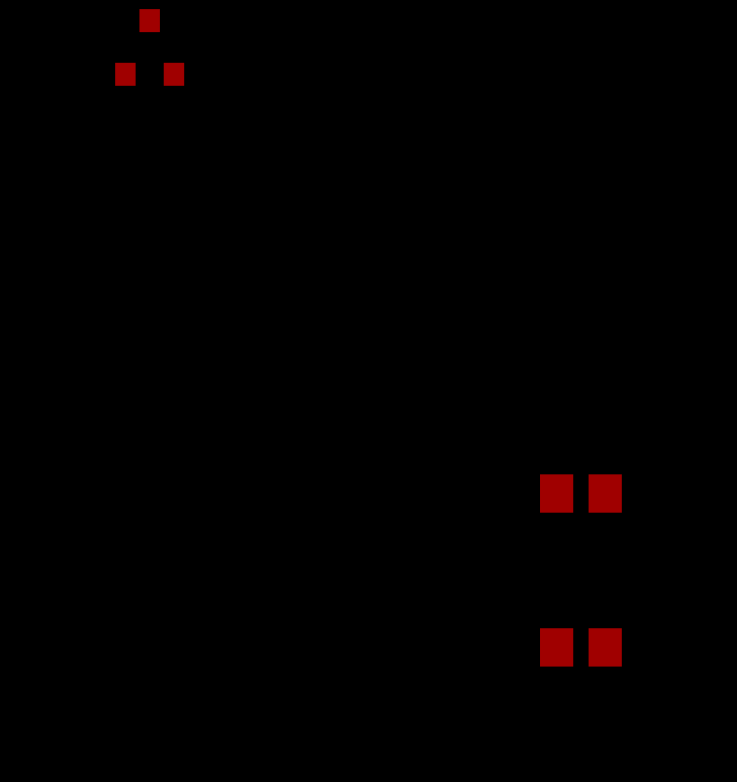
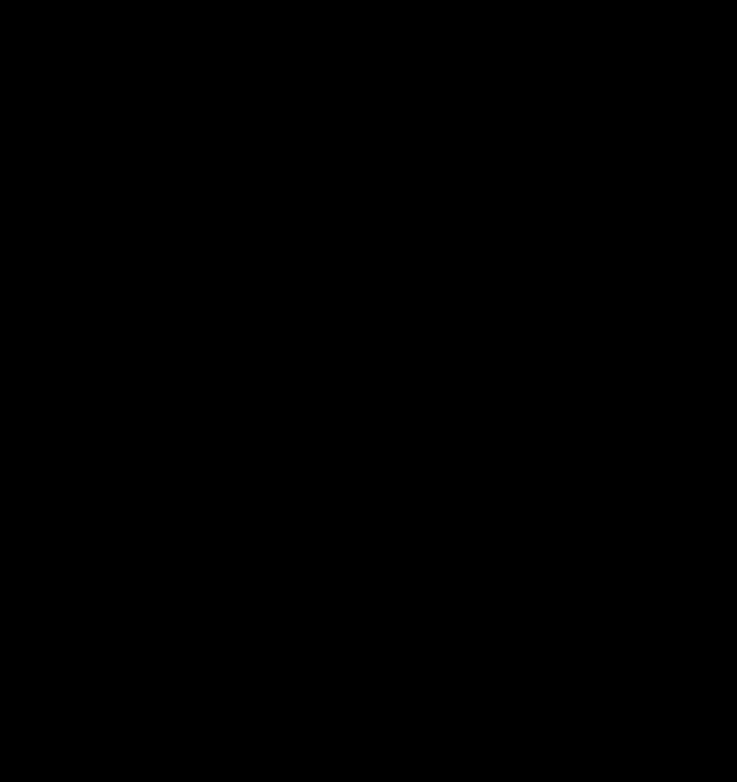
part: (149, 47) -> none
part: (580, 493) -> none
part: (580, 647) -> none

